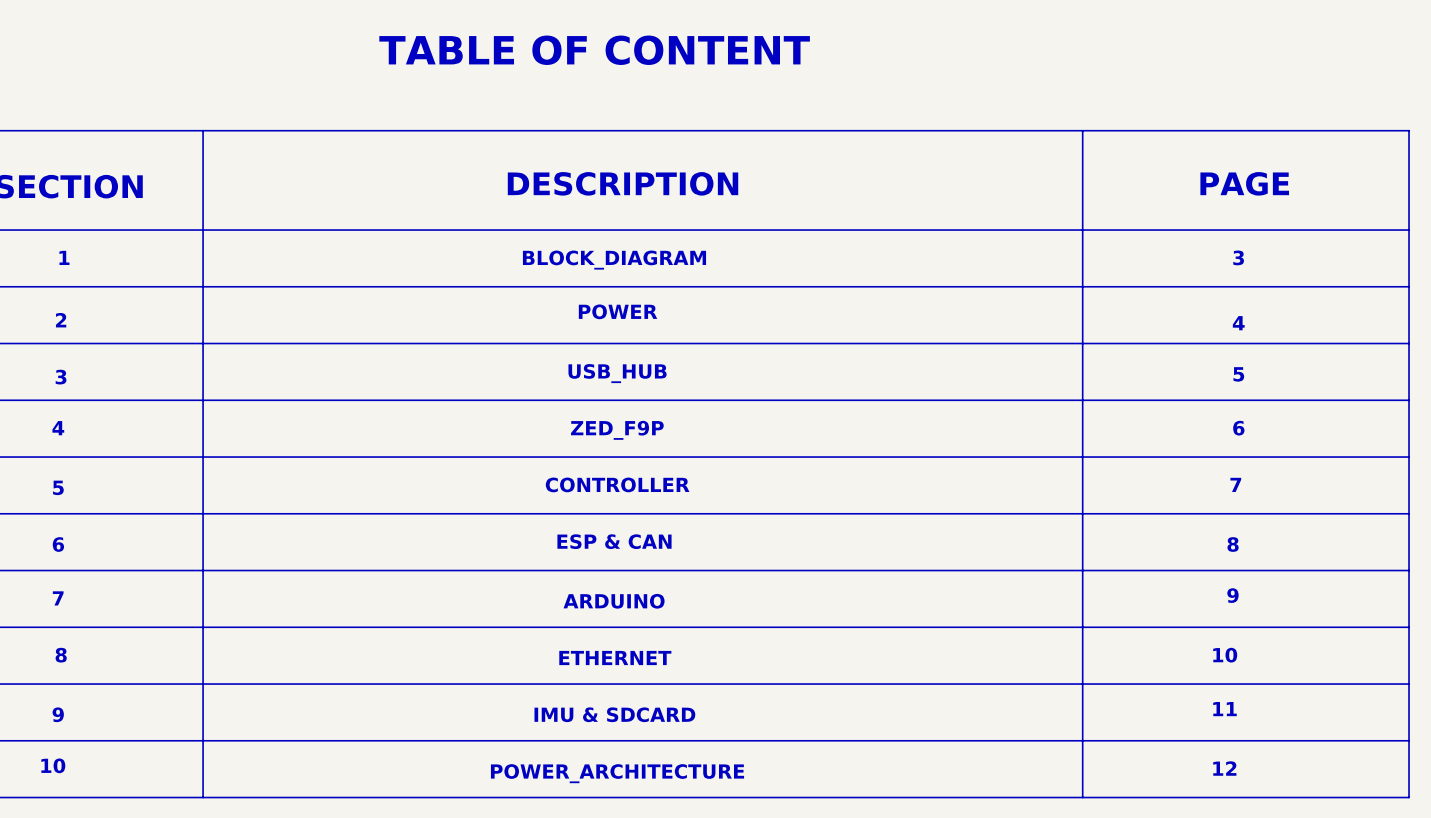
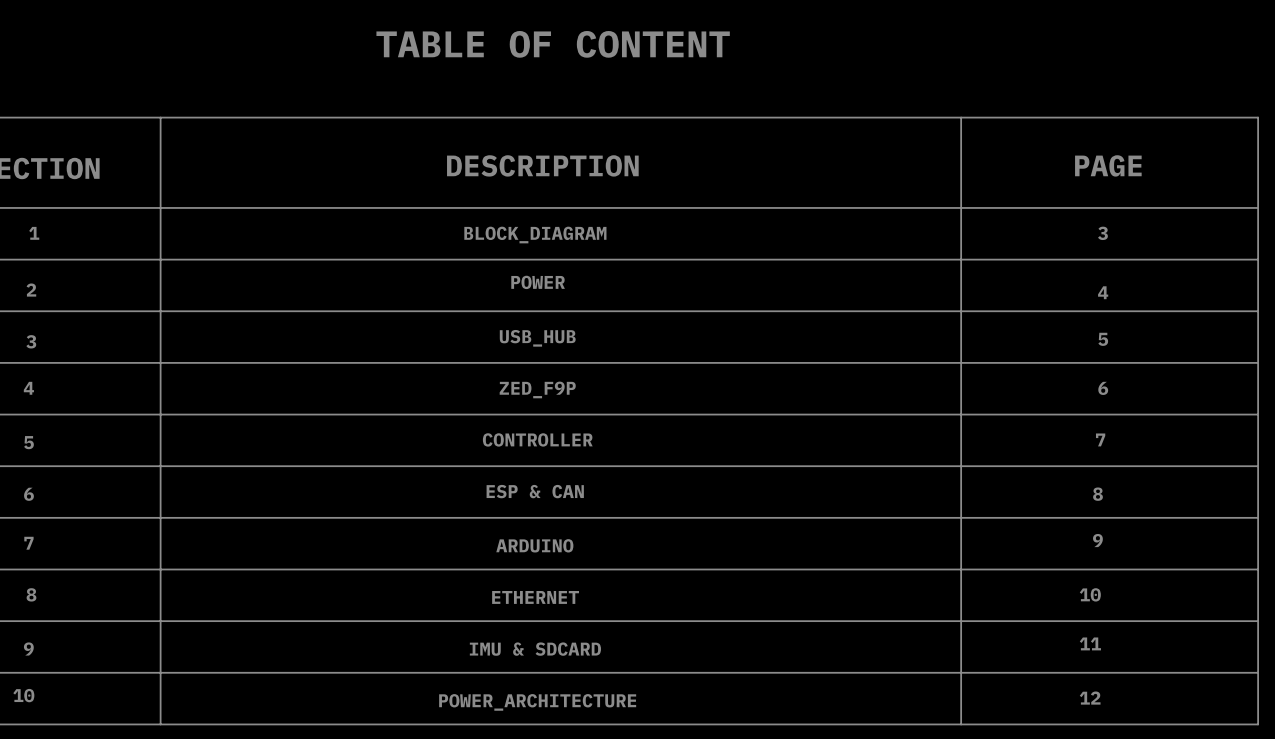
text position: TABLE OF CONTENT (594, 50) -> TABLE OF CONTENT (553, 44)

